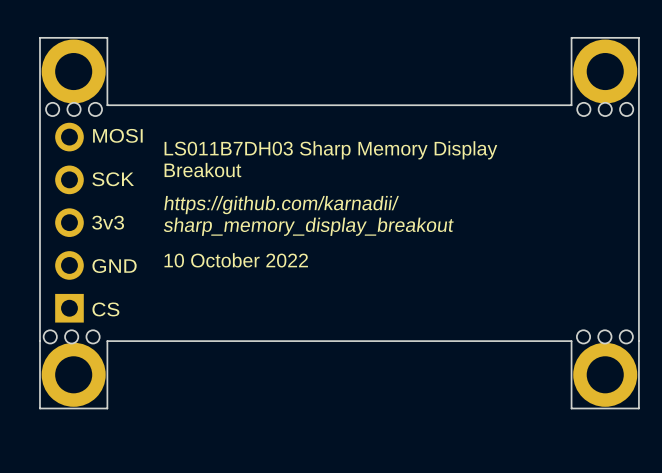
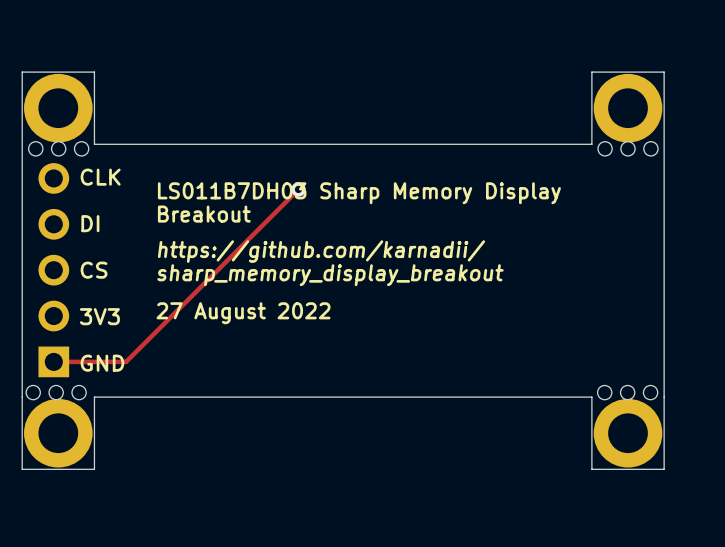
text: MOSI (117, 135) -> CLK (100, 177)
track: none -> (298, 189) (126, 361) (53, 361)
via: none -> (298, 189)
text: SCK (113, 179) -> DI (90, 223)
text: 3v3 (108, 222) -> CS (94, 270)
text: 10 October 2022 (236, 260) -> 27 August 2022 (243, 313)
text: GND (114, 266) -> 3V3 (99, 316)
text: CS (105, 309) -> GND (102, 363)

